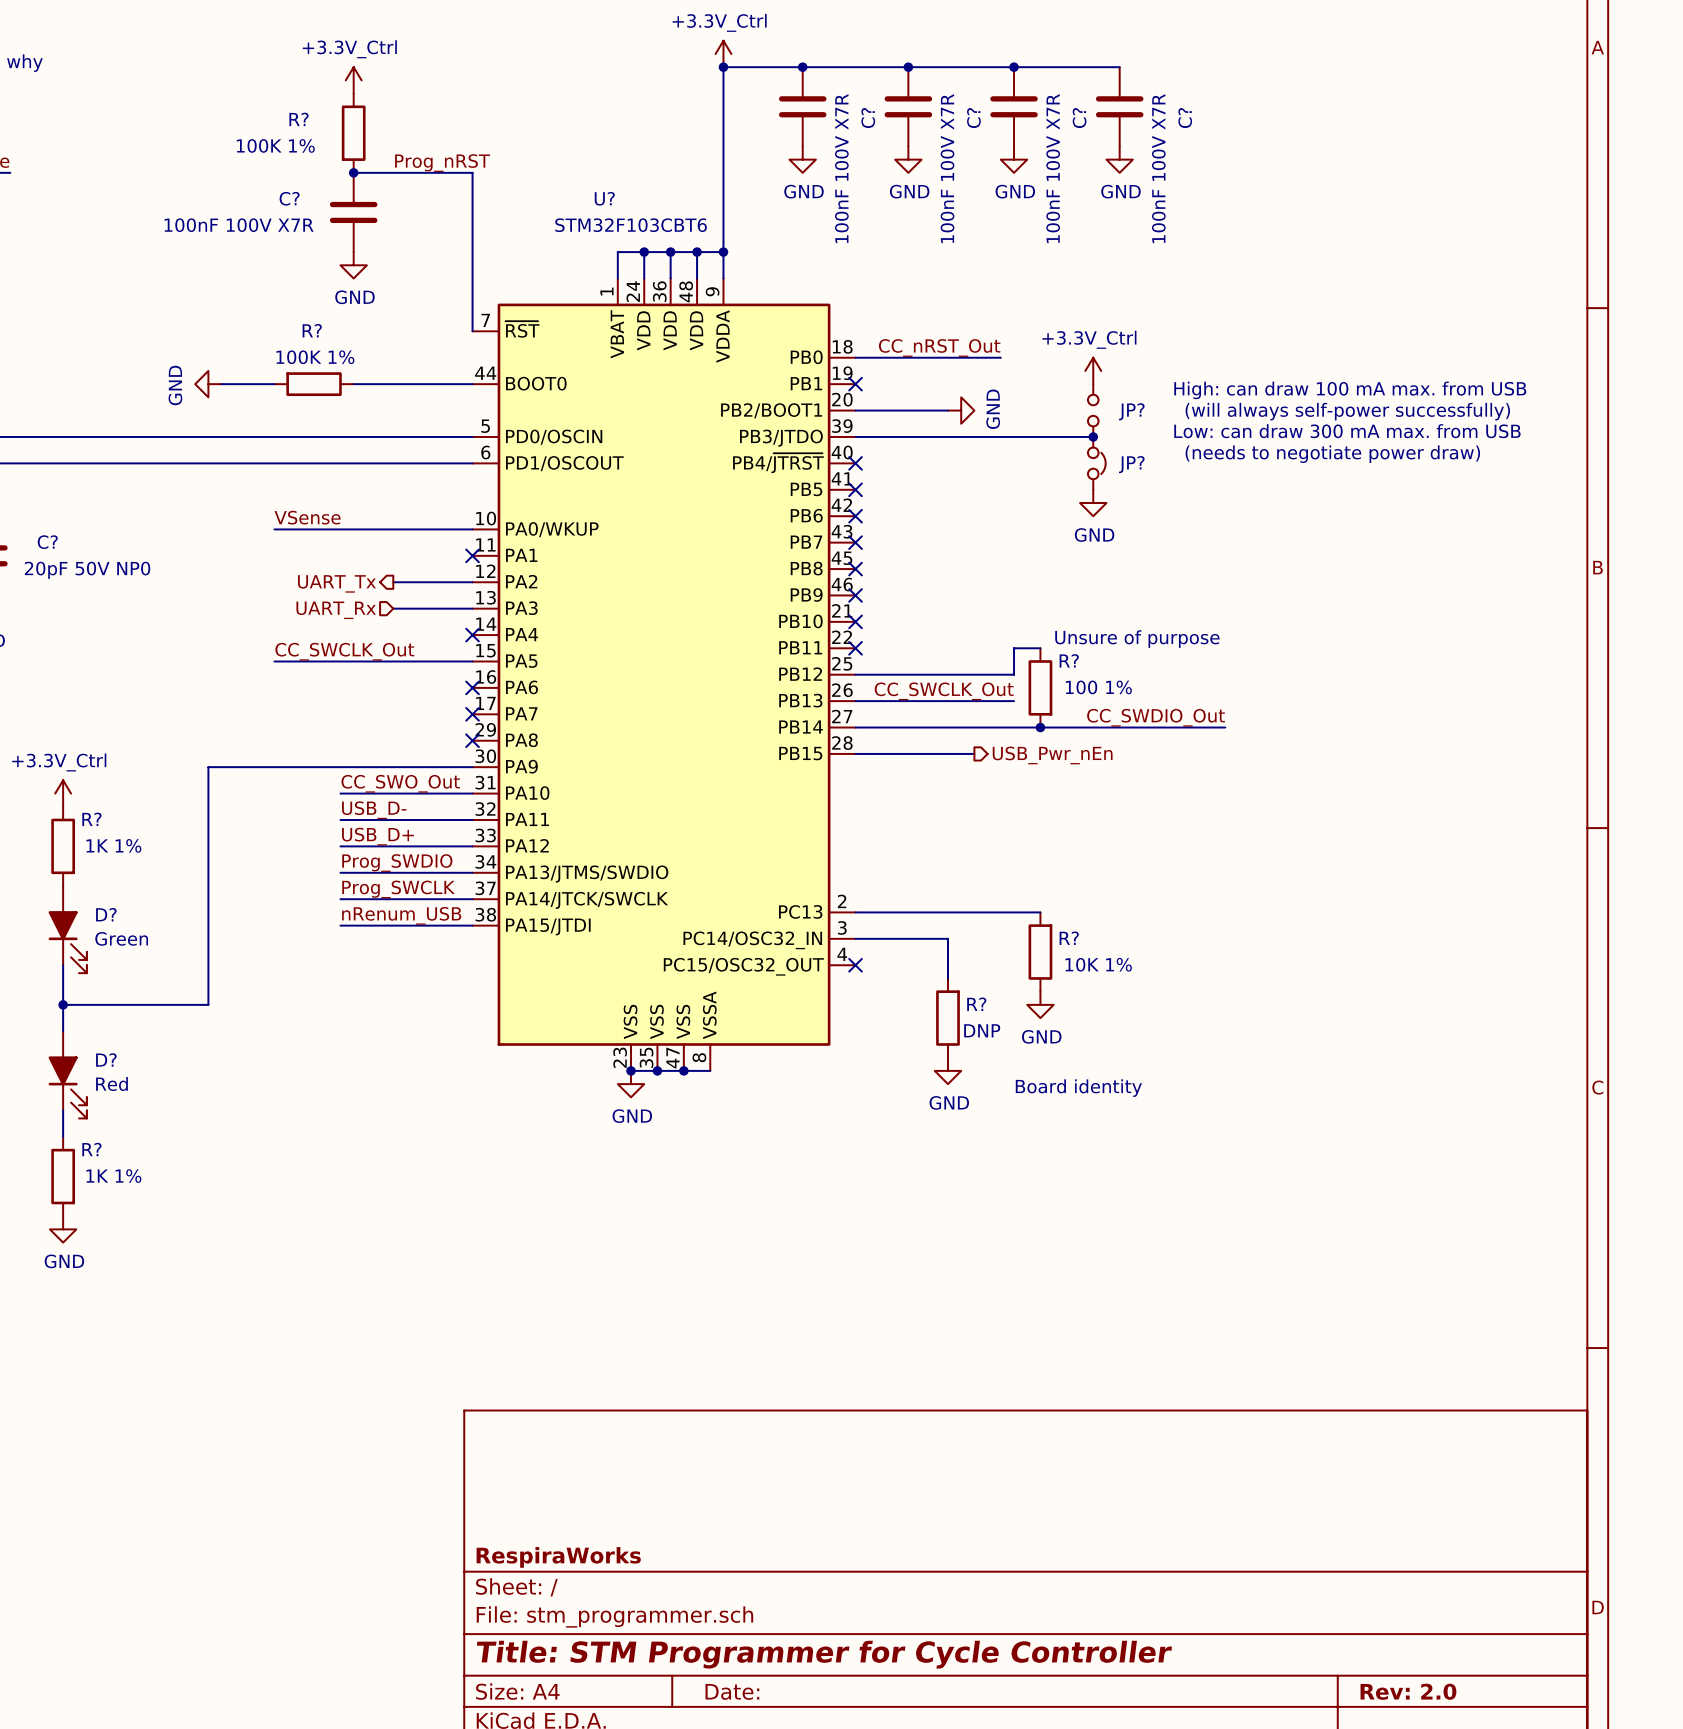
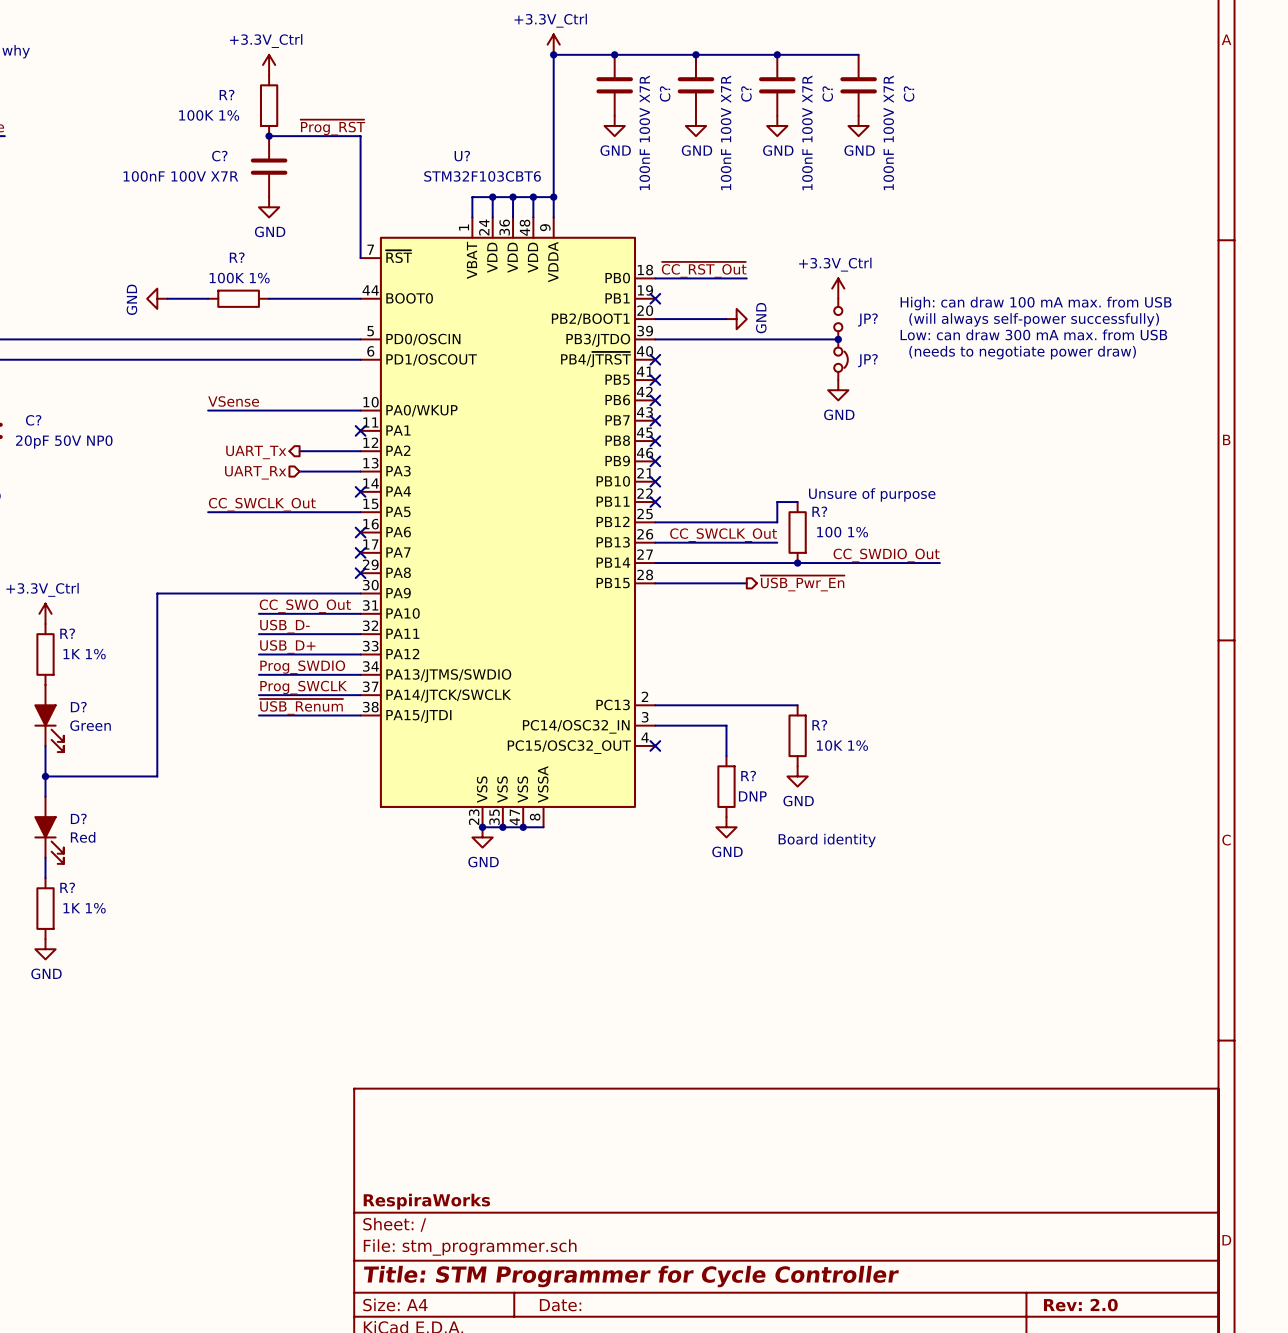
label: Prog_nRST (442, 163) -> ~{Prog_RST} (332, 127)
label: CC_nRST_Out (939, 347) -> ~{CC_RST_Out} (704, 269)
wire: (974, 357) (1000, 357) -> none
hierarchical label: USB_Pwr_nEn (1052, 755) -> ~{USB_Pwr_En} (802, 583)
label: nRenum_USB (401, 915) -> ~{USB_Renum} (301, 706)

